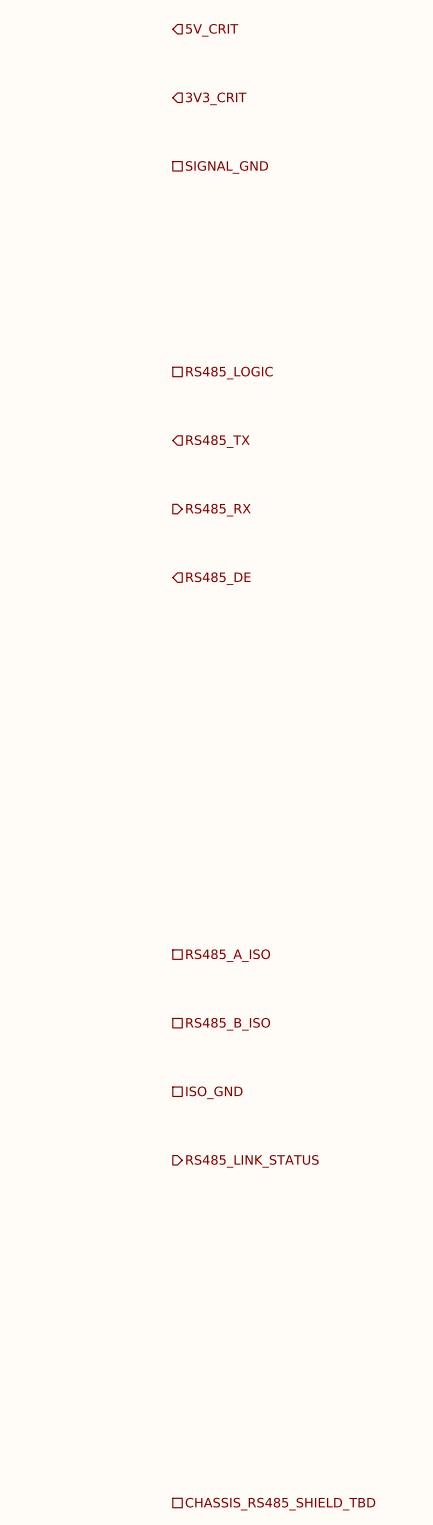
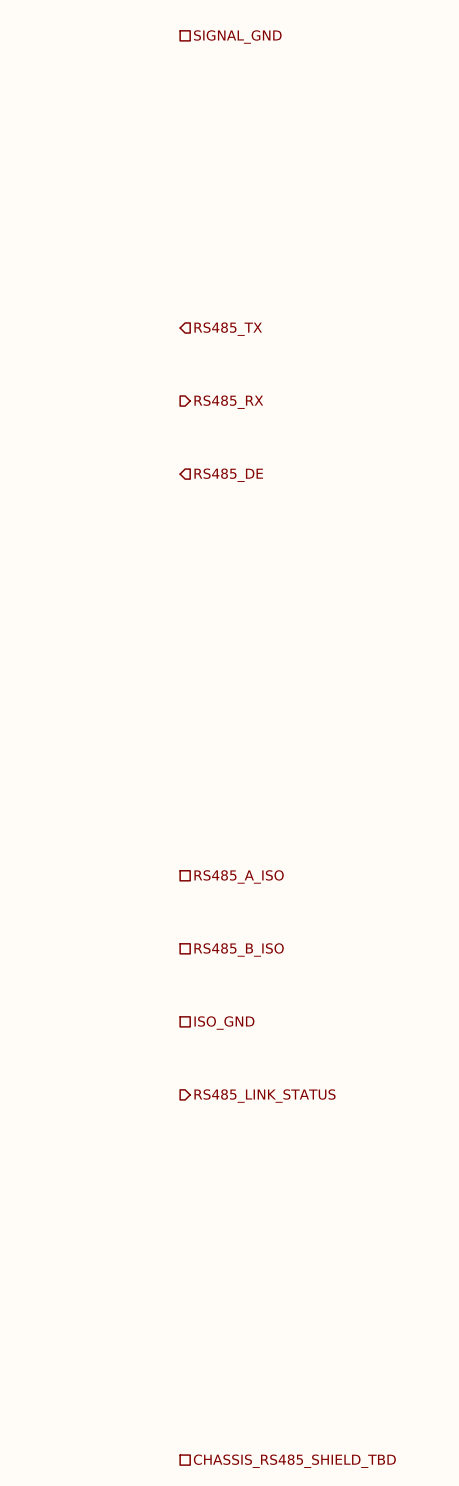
hierarchical label: RS485_LOGIC (229, 373) -> none

